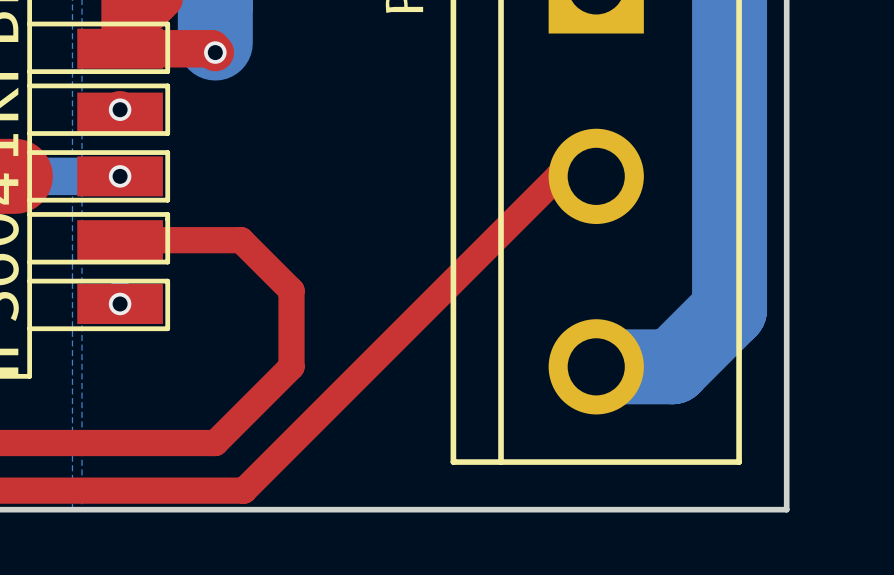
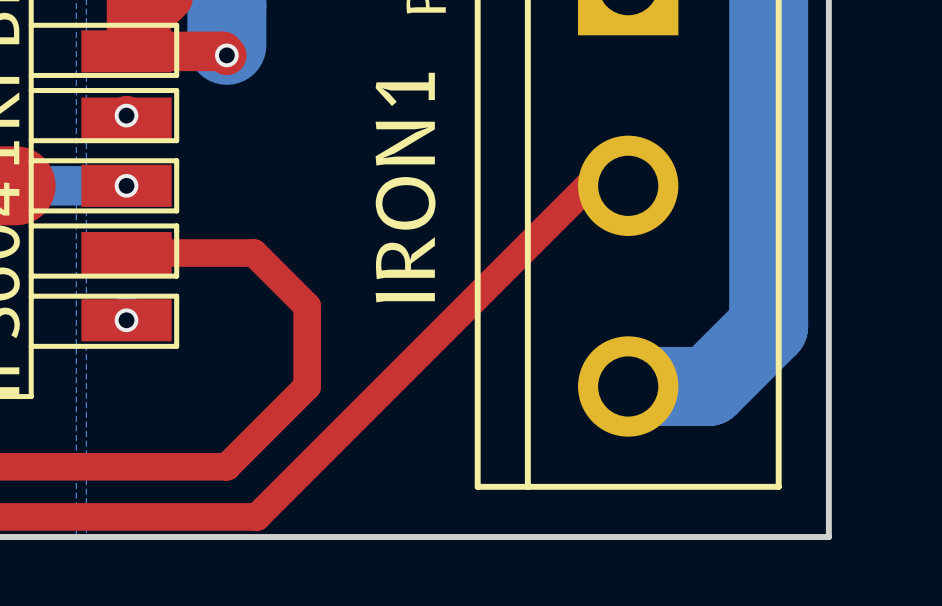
text: none -> IRON1 (405, 187)

